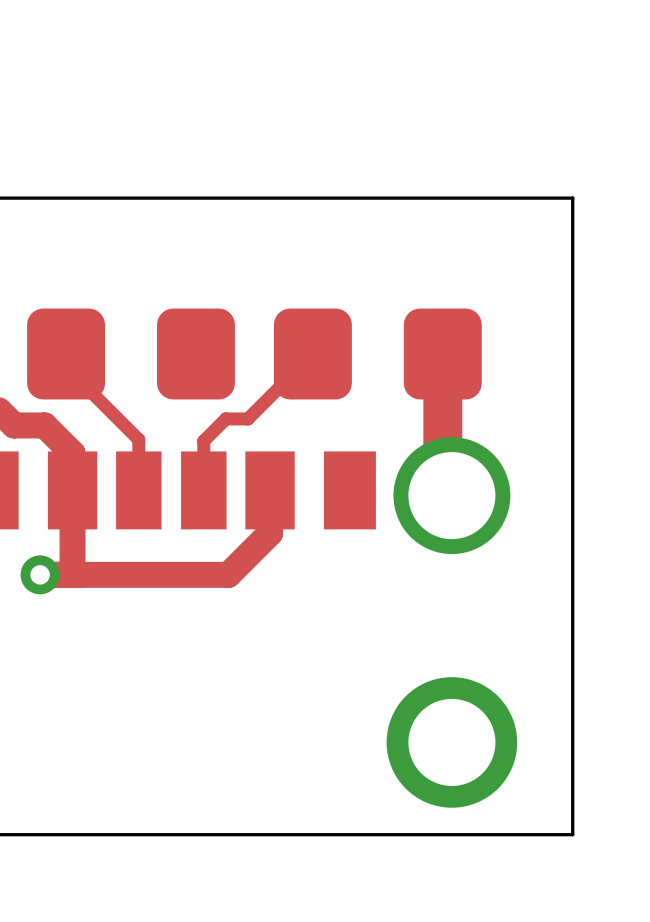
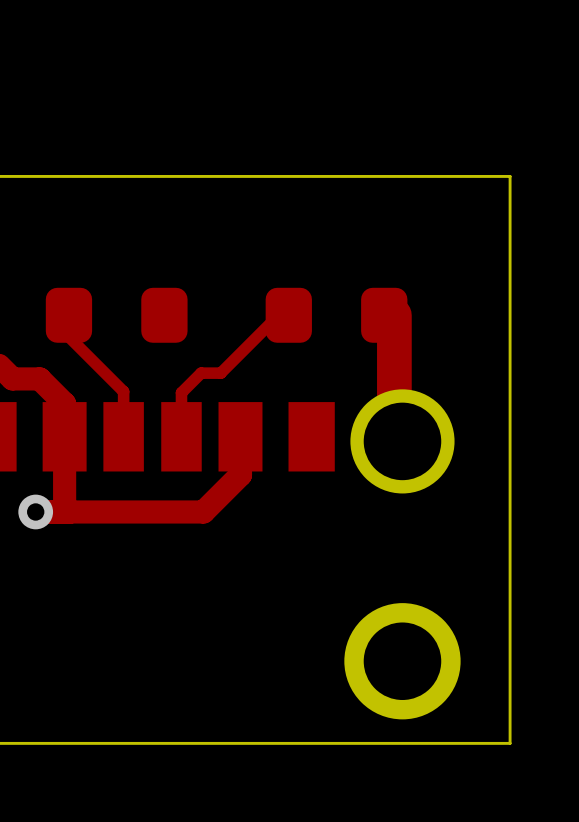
part footprint: [27, 308, 235, 400] -> [45, 287, 188, 343]
part footprint: [273, 308, 482, 400] -> [265, 287, 408, 343]

